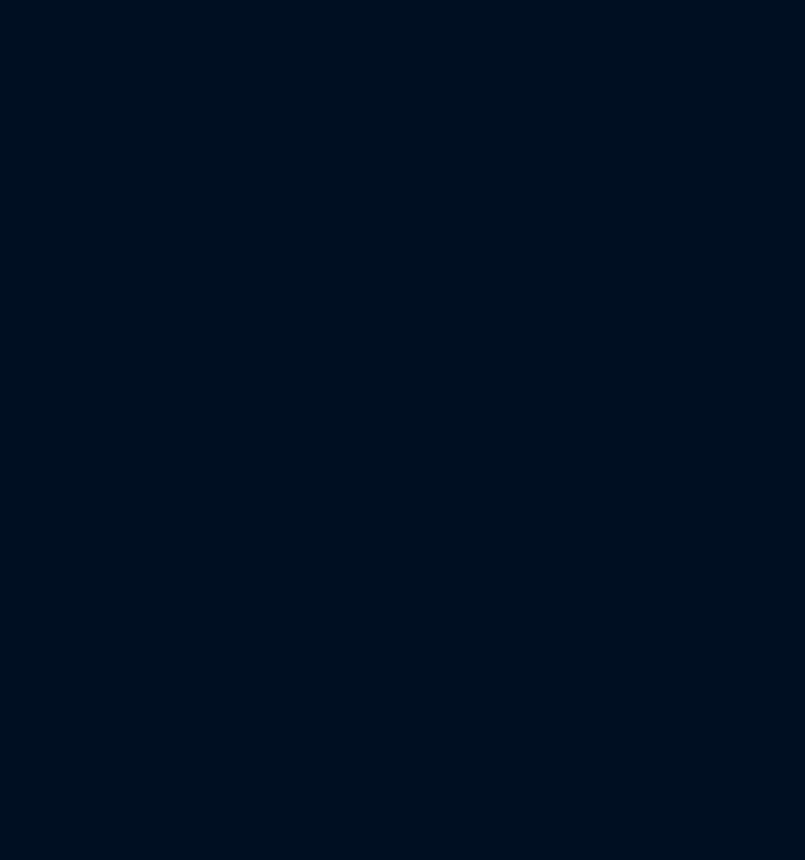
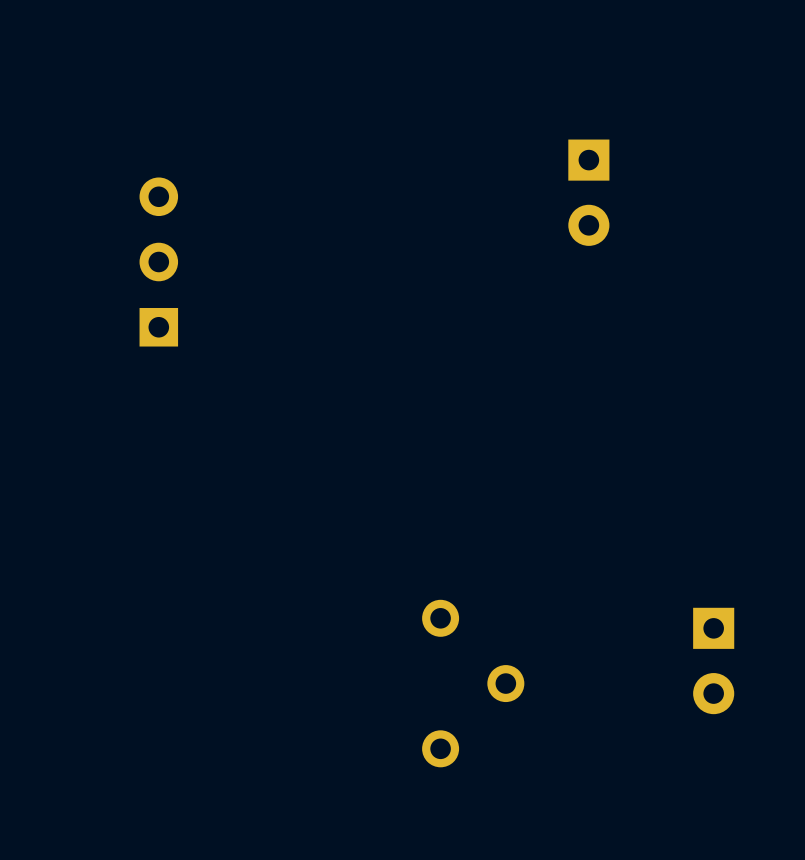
part: none -> (588, 192)
part: none -> (158, 262)
part: none -> (713, 660)
part: none -> (473, 683)

